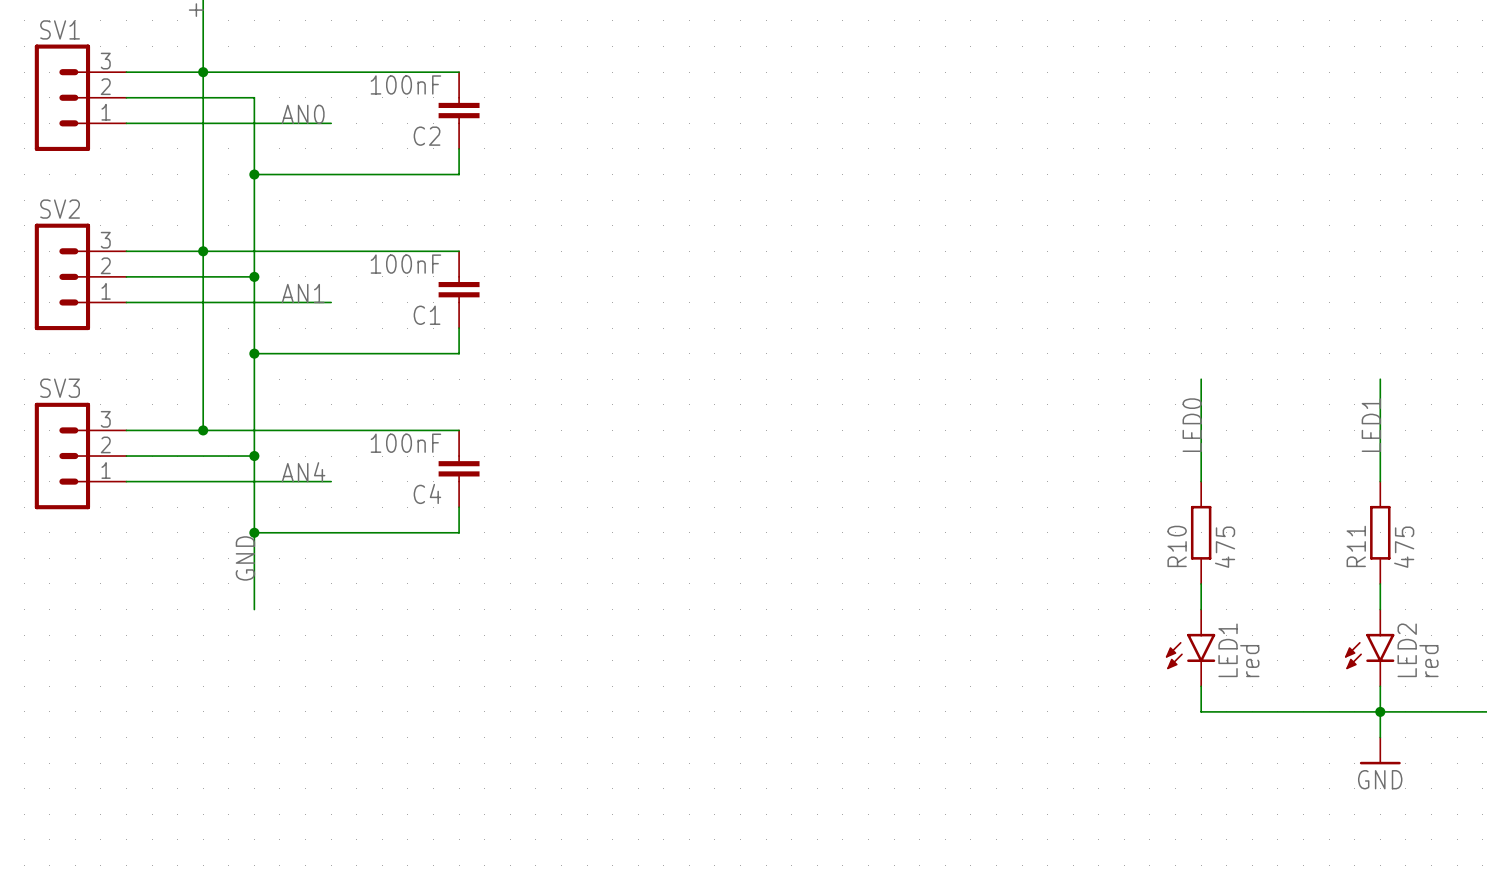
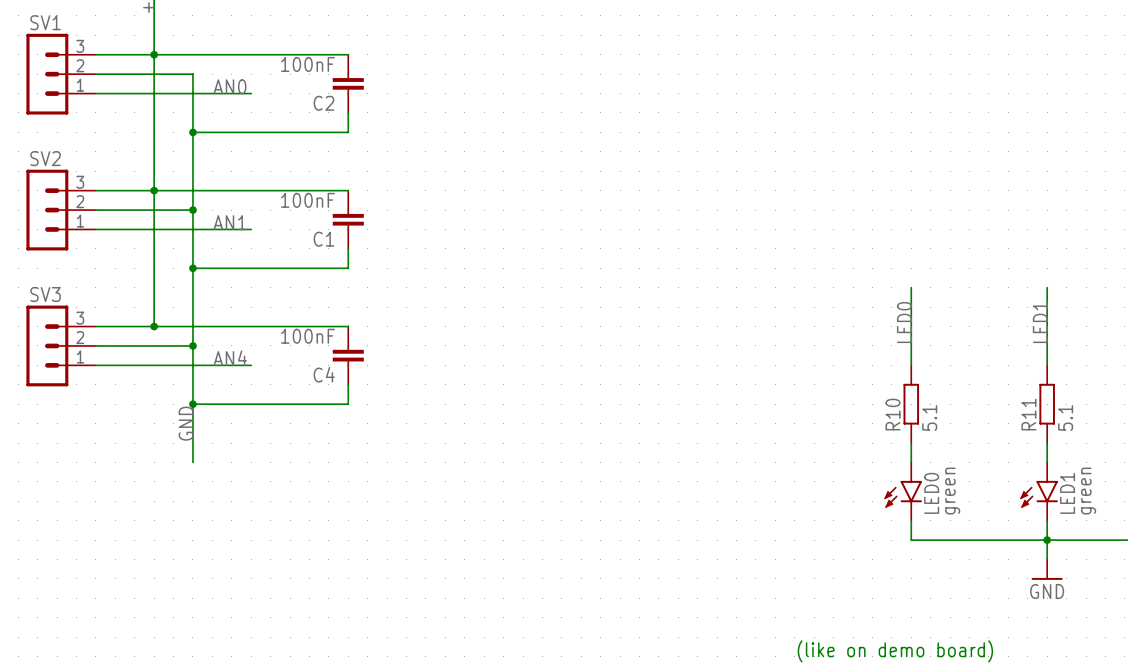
R10 value: 475 (1225, 547) -> 5.1 (929, 418)
R11 value: 475 (1404, 547) -> 5.1 (1065, 418)
LED1 name: LED1 (1228, 650) -> LED0 (931, 493)
LED2 name: LED2 (1407, 650) -> LED1 (1067, 493)
LED1 value: red (1249, 661) -> green (952, 491)
LED2 value: red (1428, 661) -> green (1088, 491)
text: none -> (like on demo board) (895, 651)

